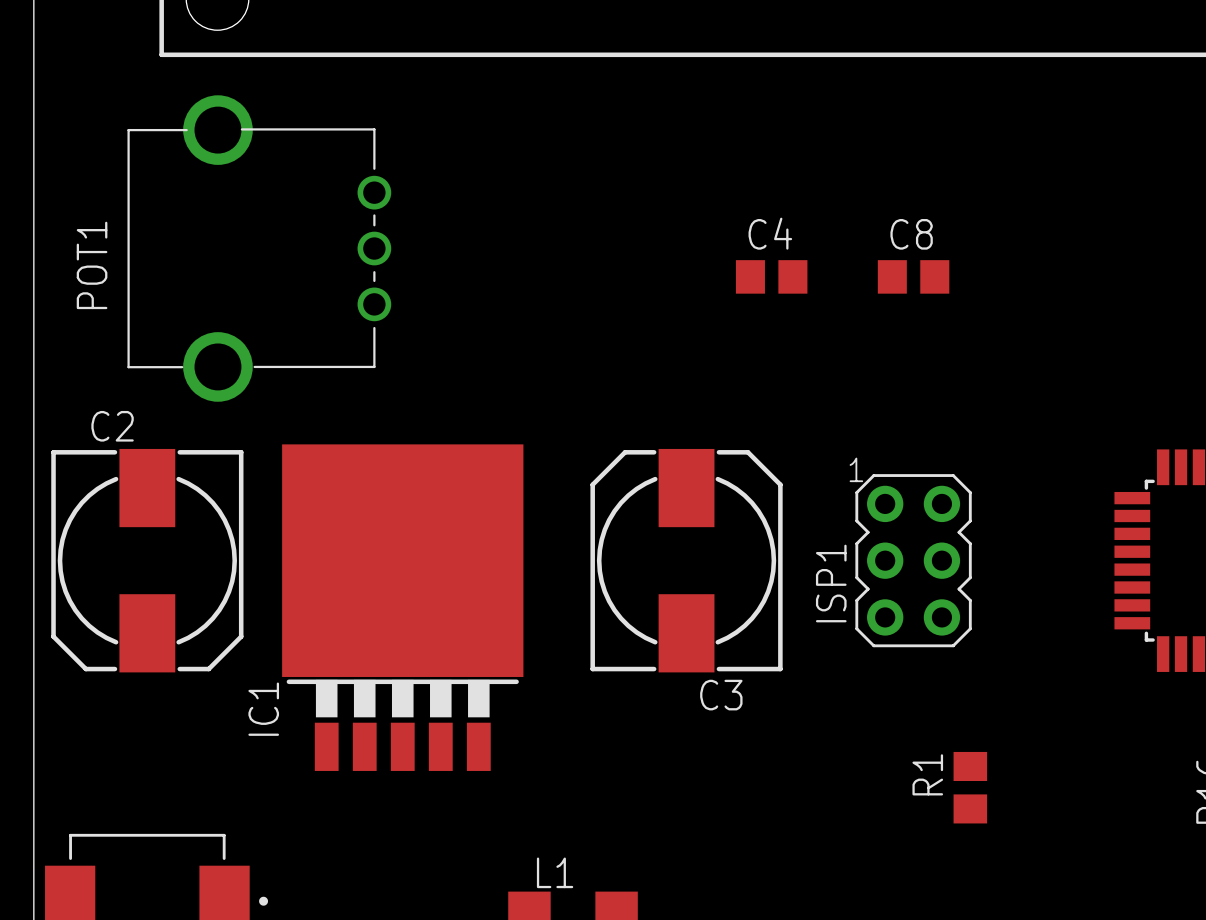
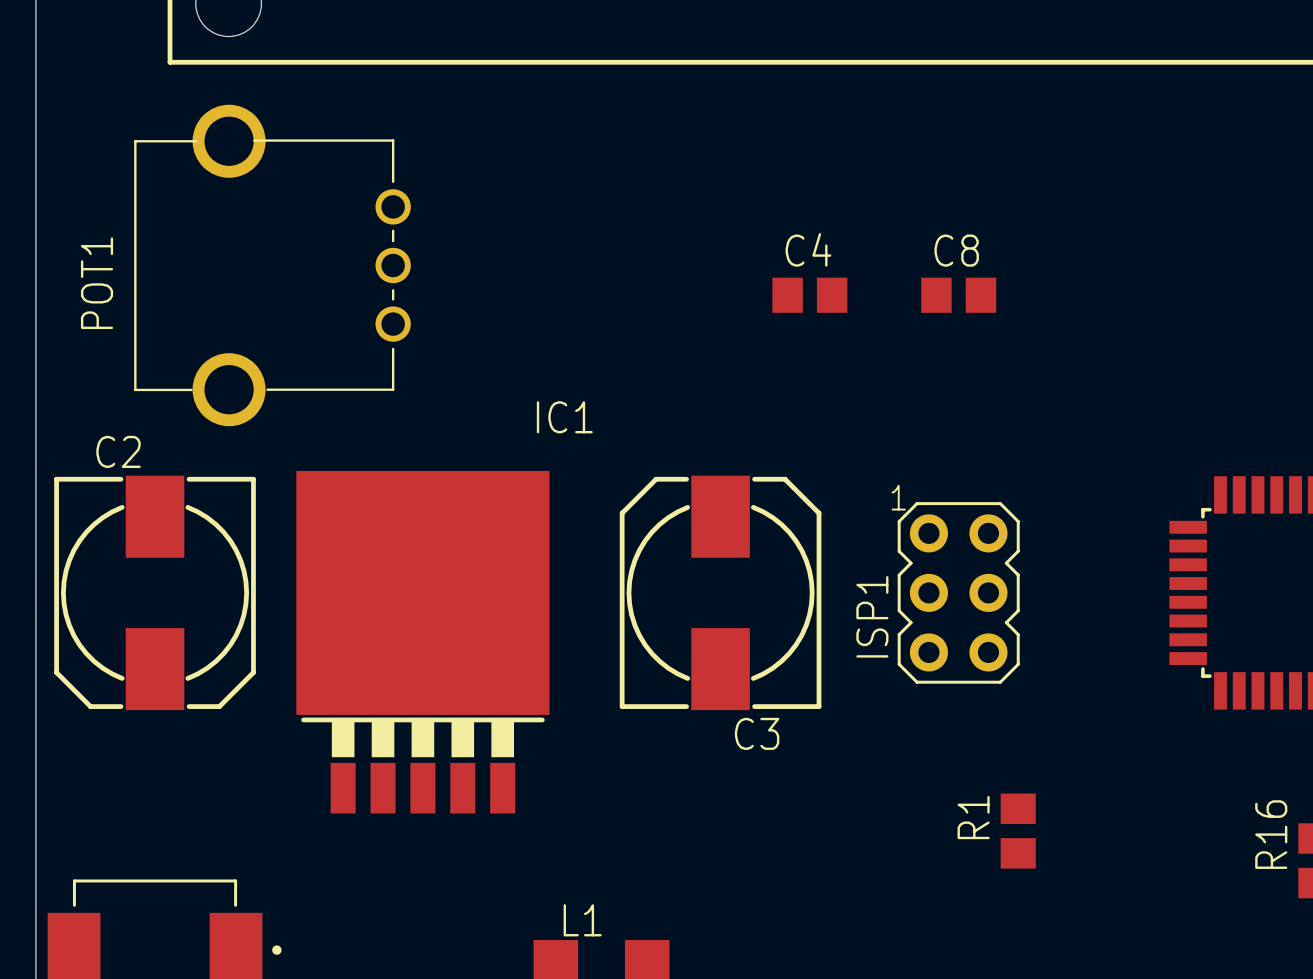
IC1 name rotation: 0° (263, 709) -> 90° clockwise (564, 417)
IC1 name position: IC1 (263, 709) -> IC1 (564, 417)

